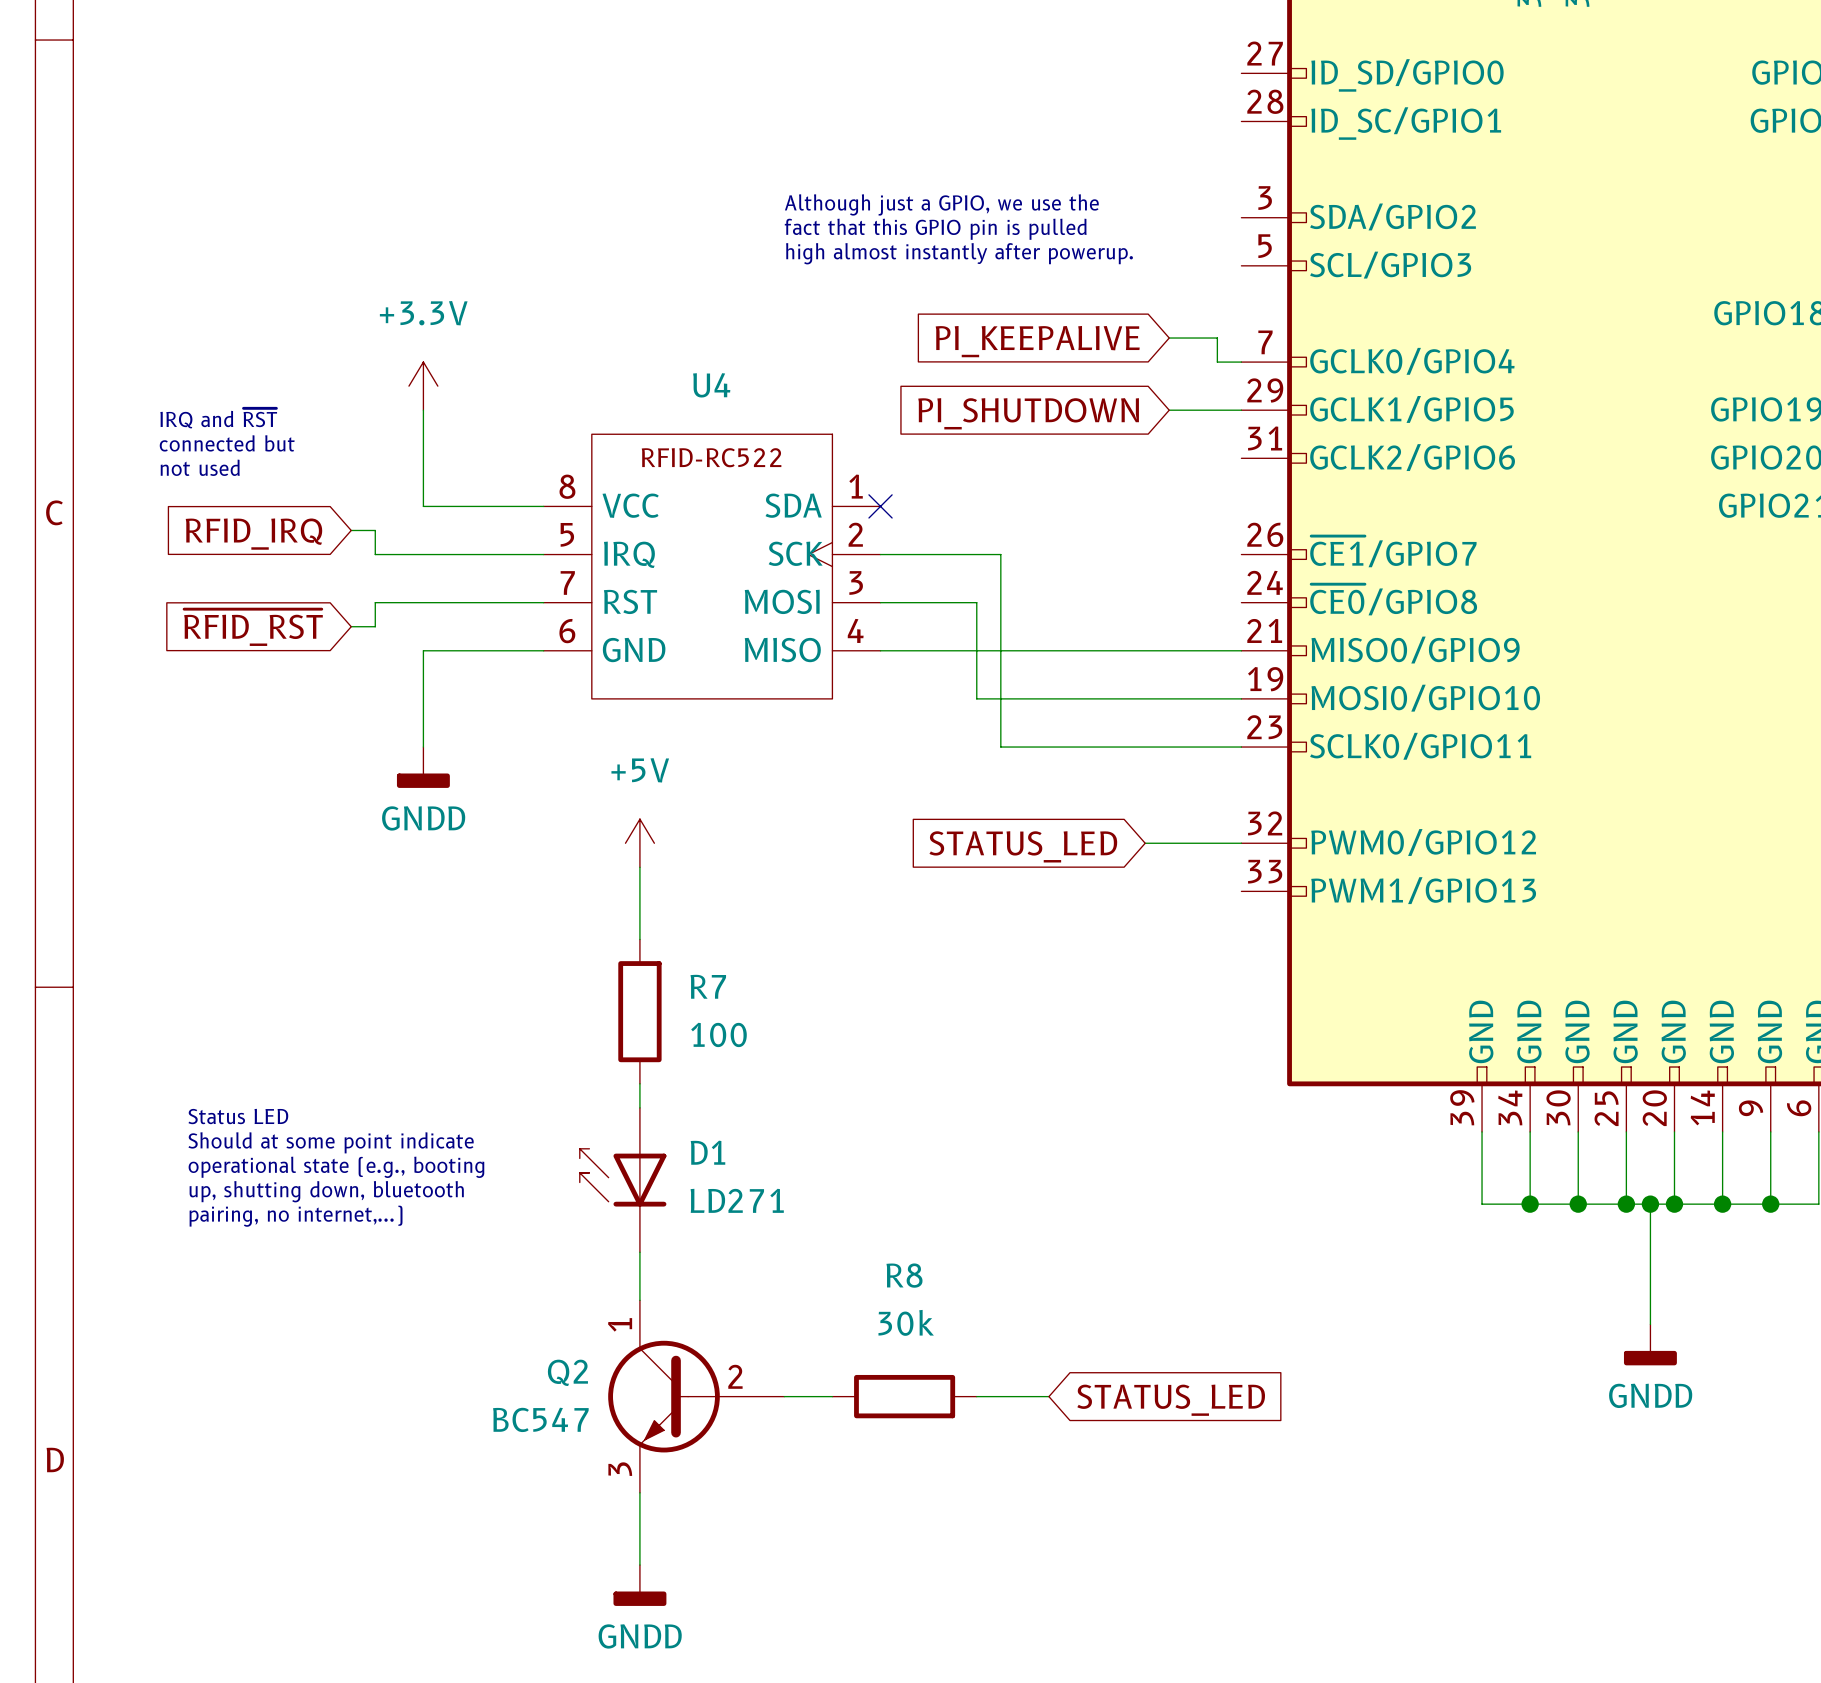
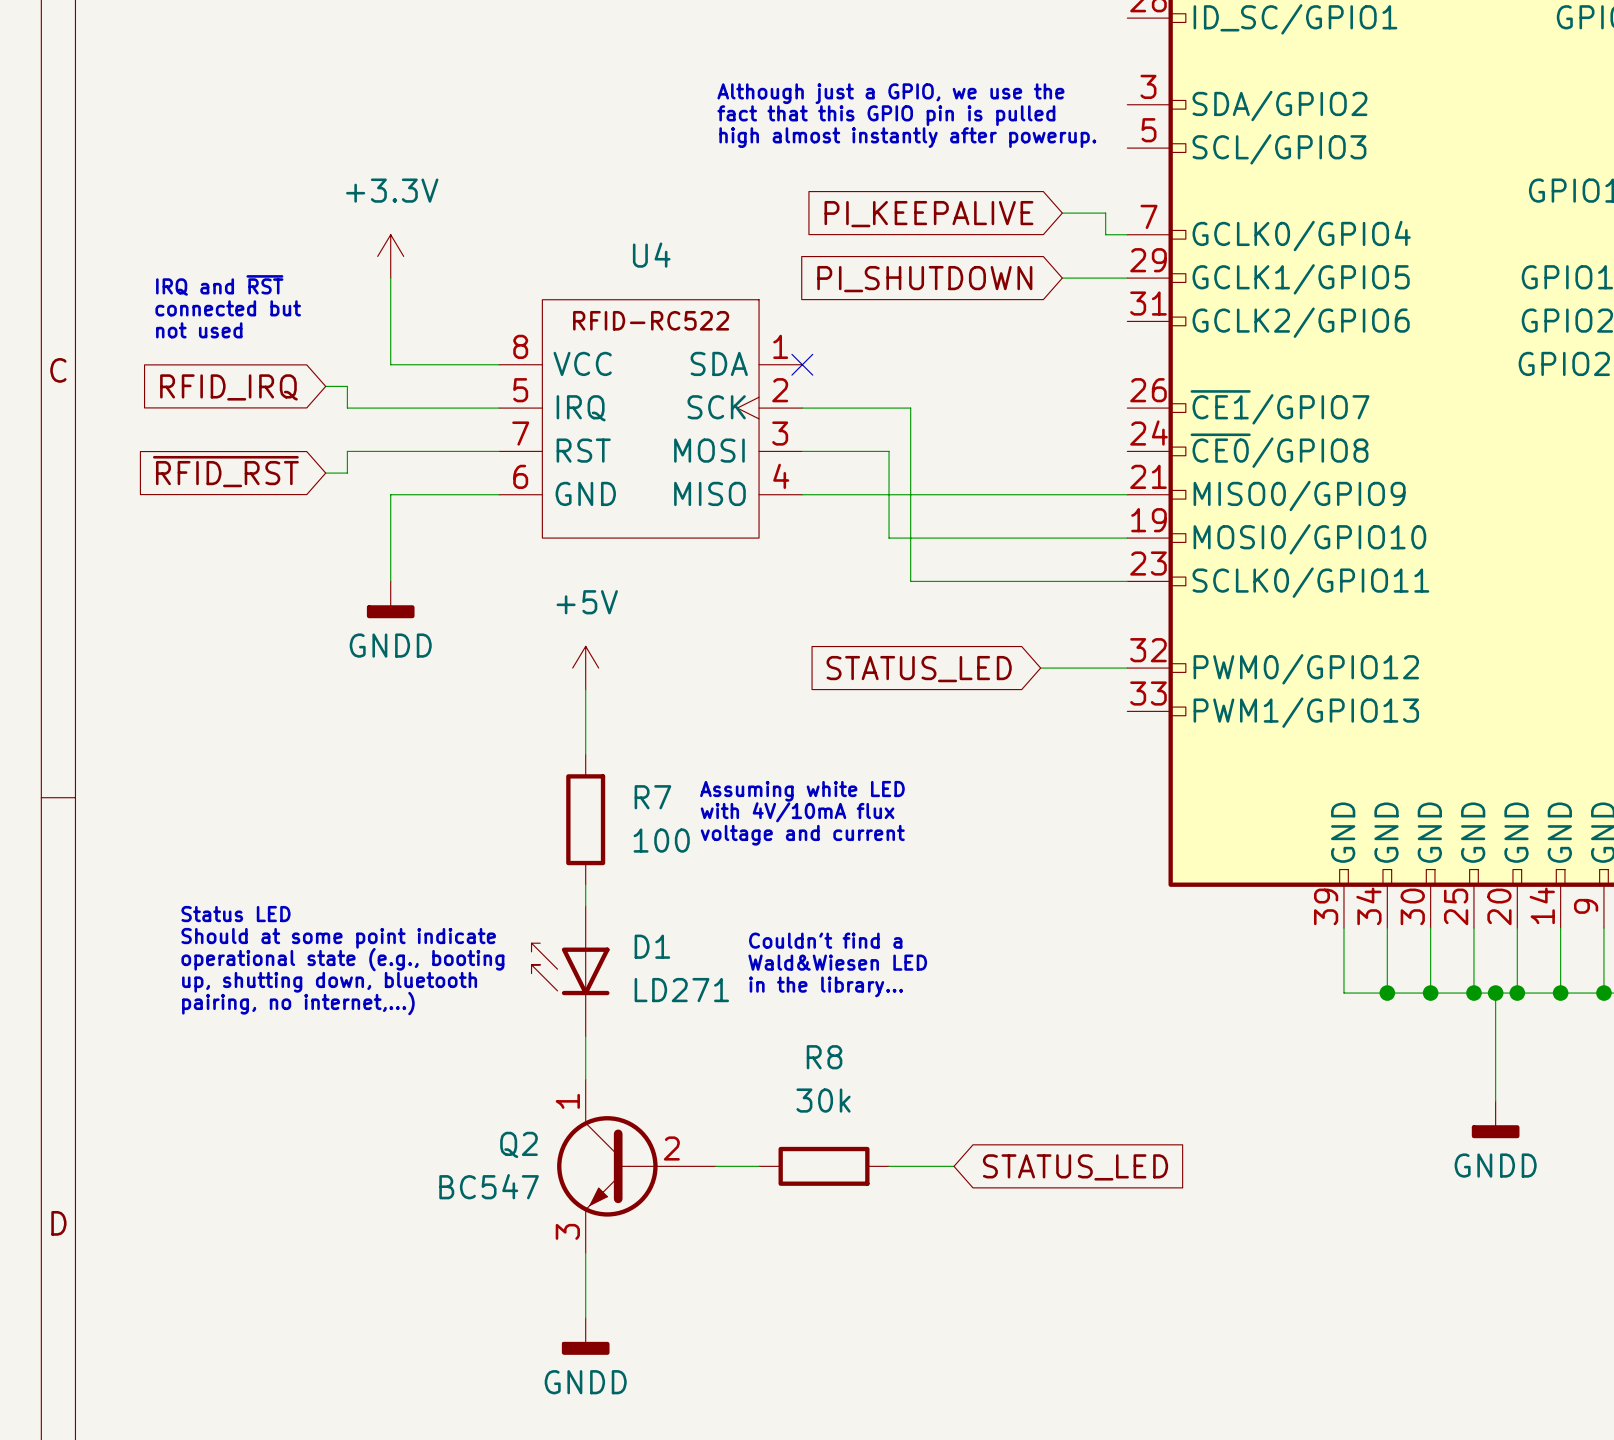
text: none -> Assuming white LED (802, 791)
text: none -> with 4V/10mA flux (797, 812)
text: none -> voltage and current (802, 835)
text: none -> Couldn't find a (825, 940)
text: none -> Wald&Wiesen LED (837, 962)
text: none -> in the library... (826, 986)

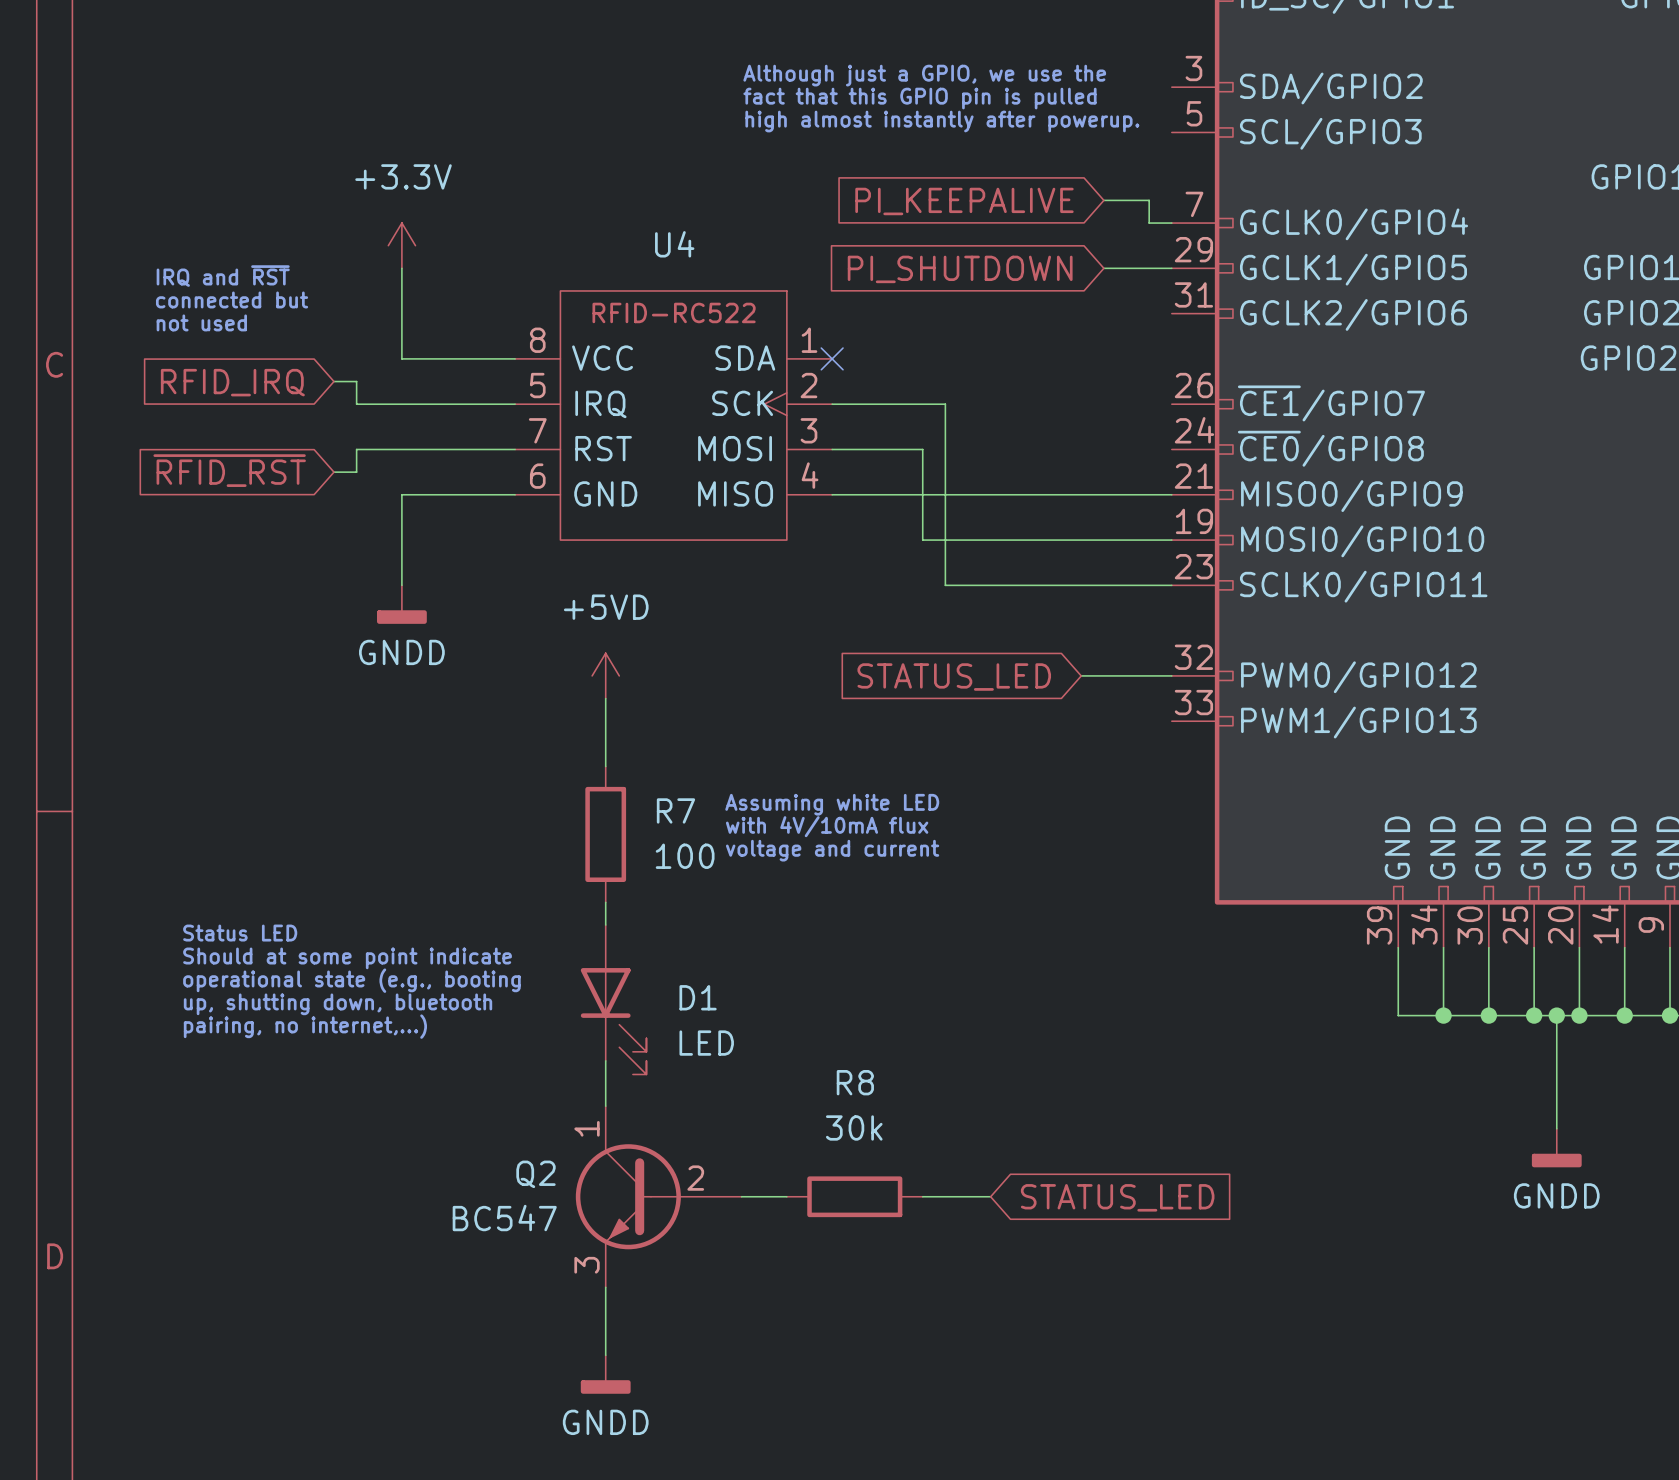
power symbol: +5V (585, 668) -> +5VD (605, 675)
D1 symbol: [531, 906, 610, 1037] -> [580, 925, 647, 1075]
text: Couldn't find a (825, 940) -> none
text: Wald&Wiesen LED (837, 962) -> none
text: in the library... (826, 986) -> none
D1 value: LD271 (681, 990) -> LED (706, 1043)

